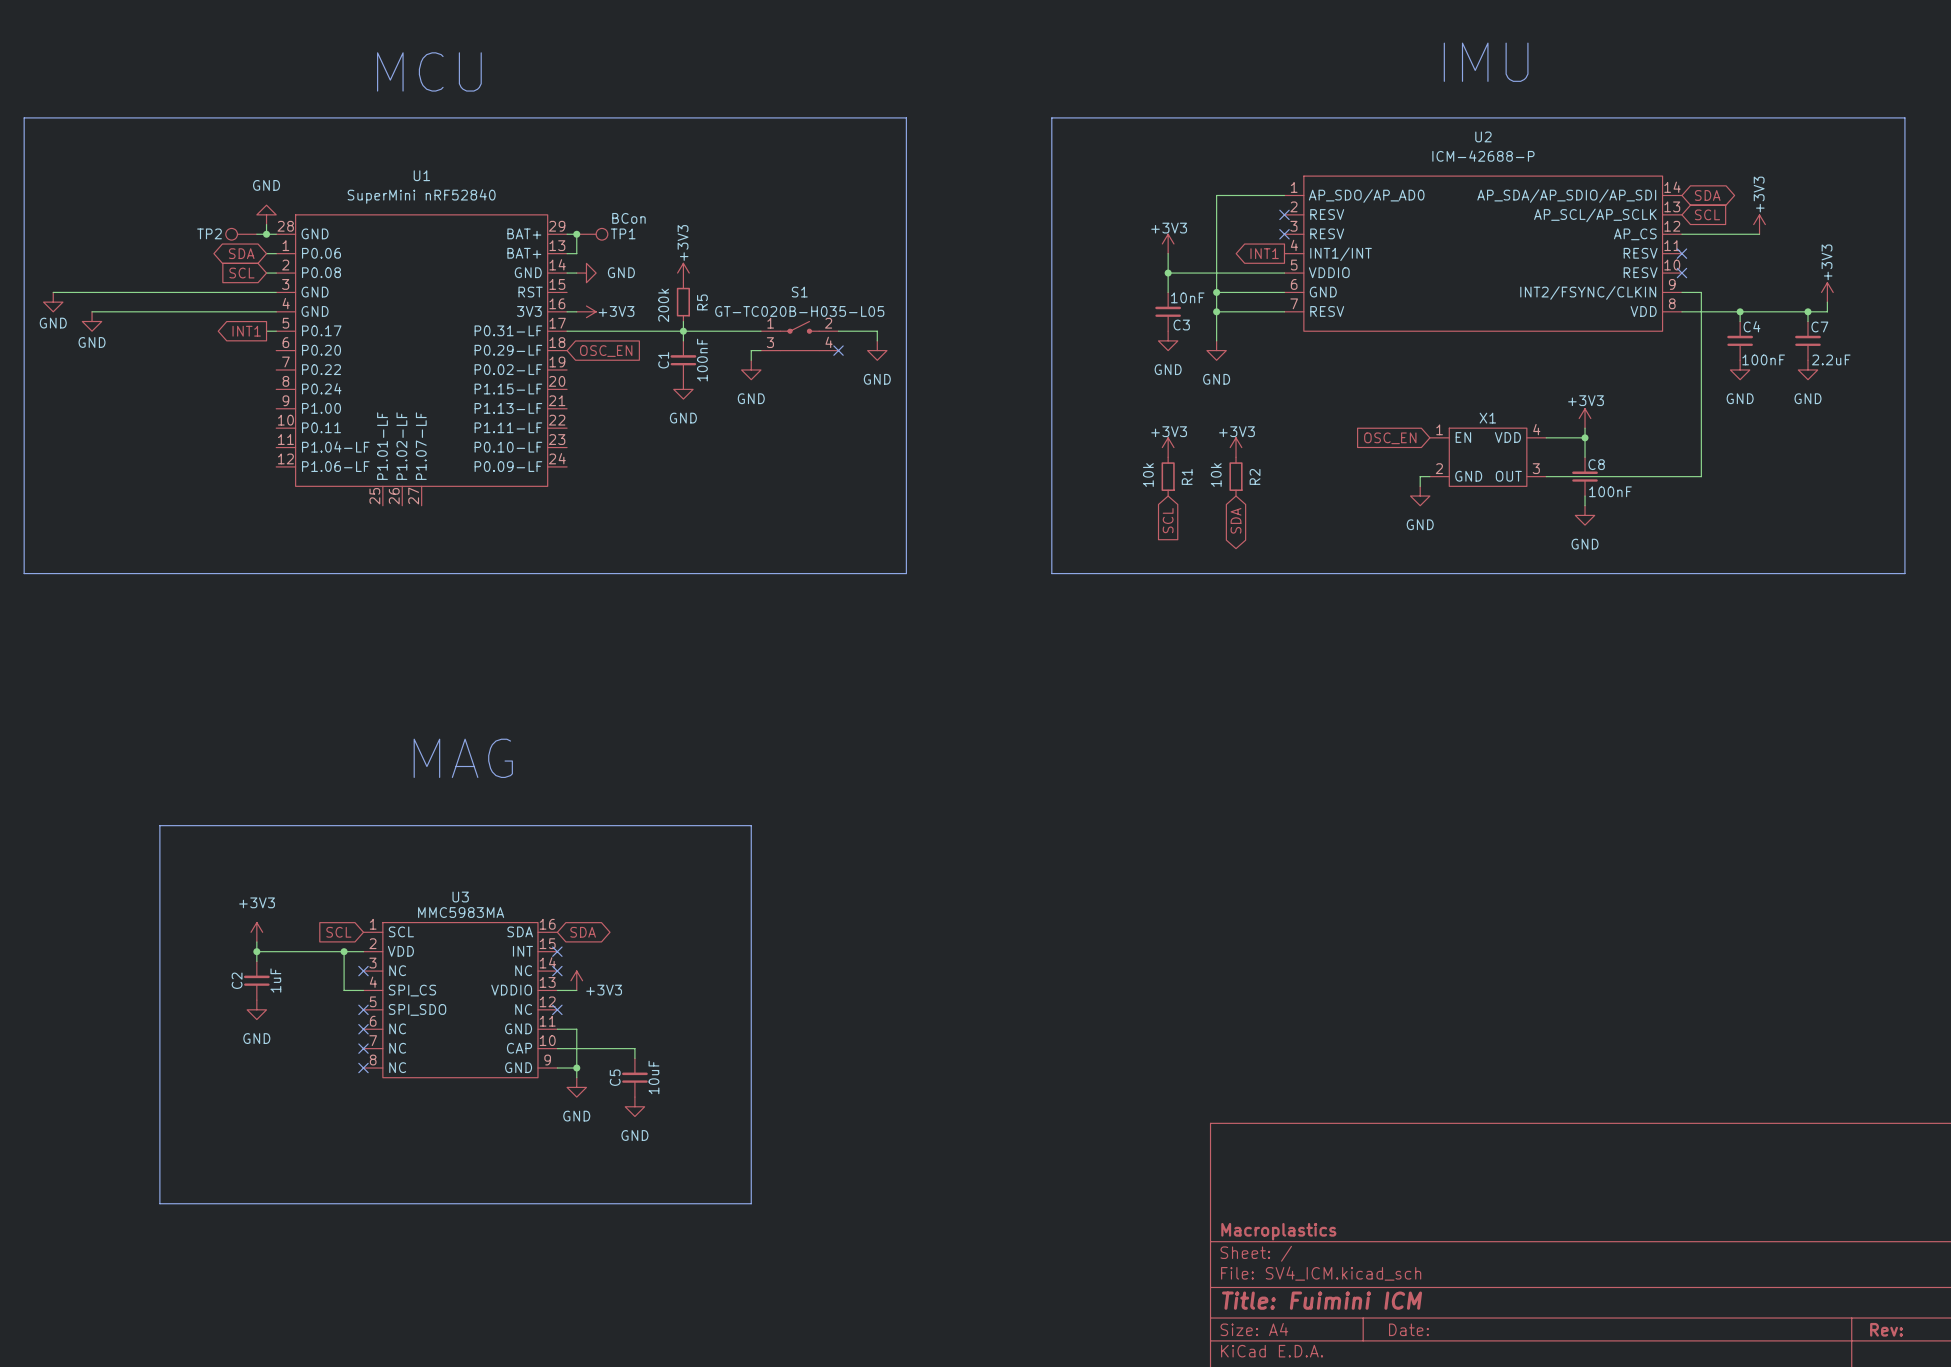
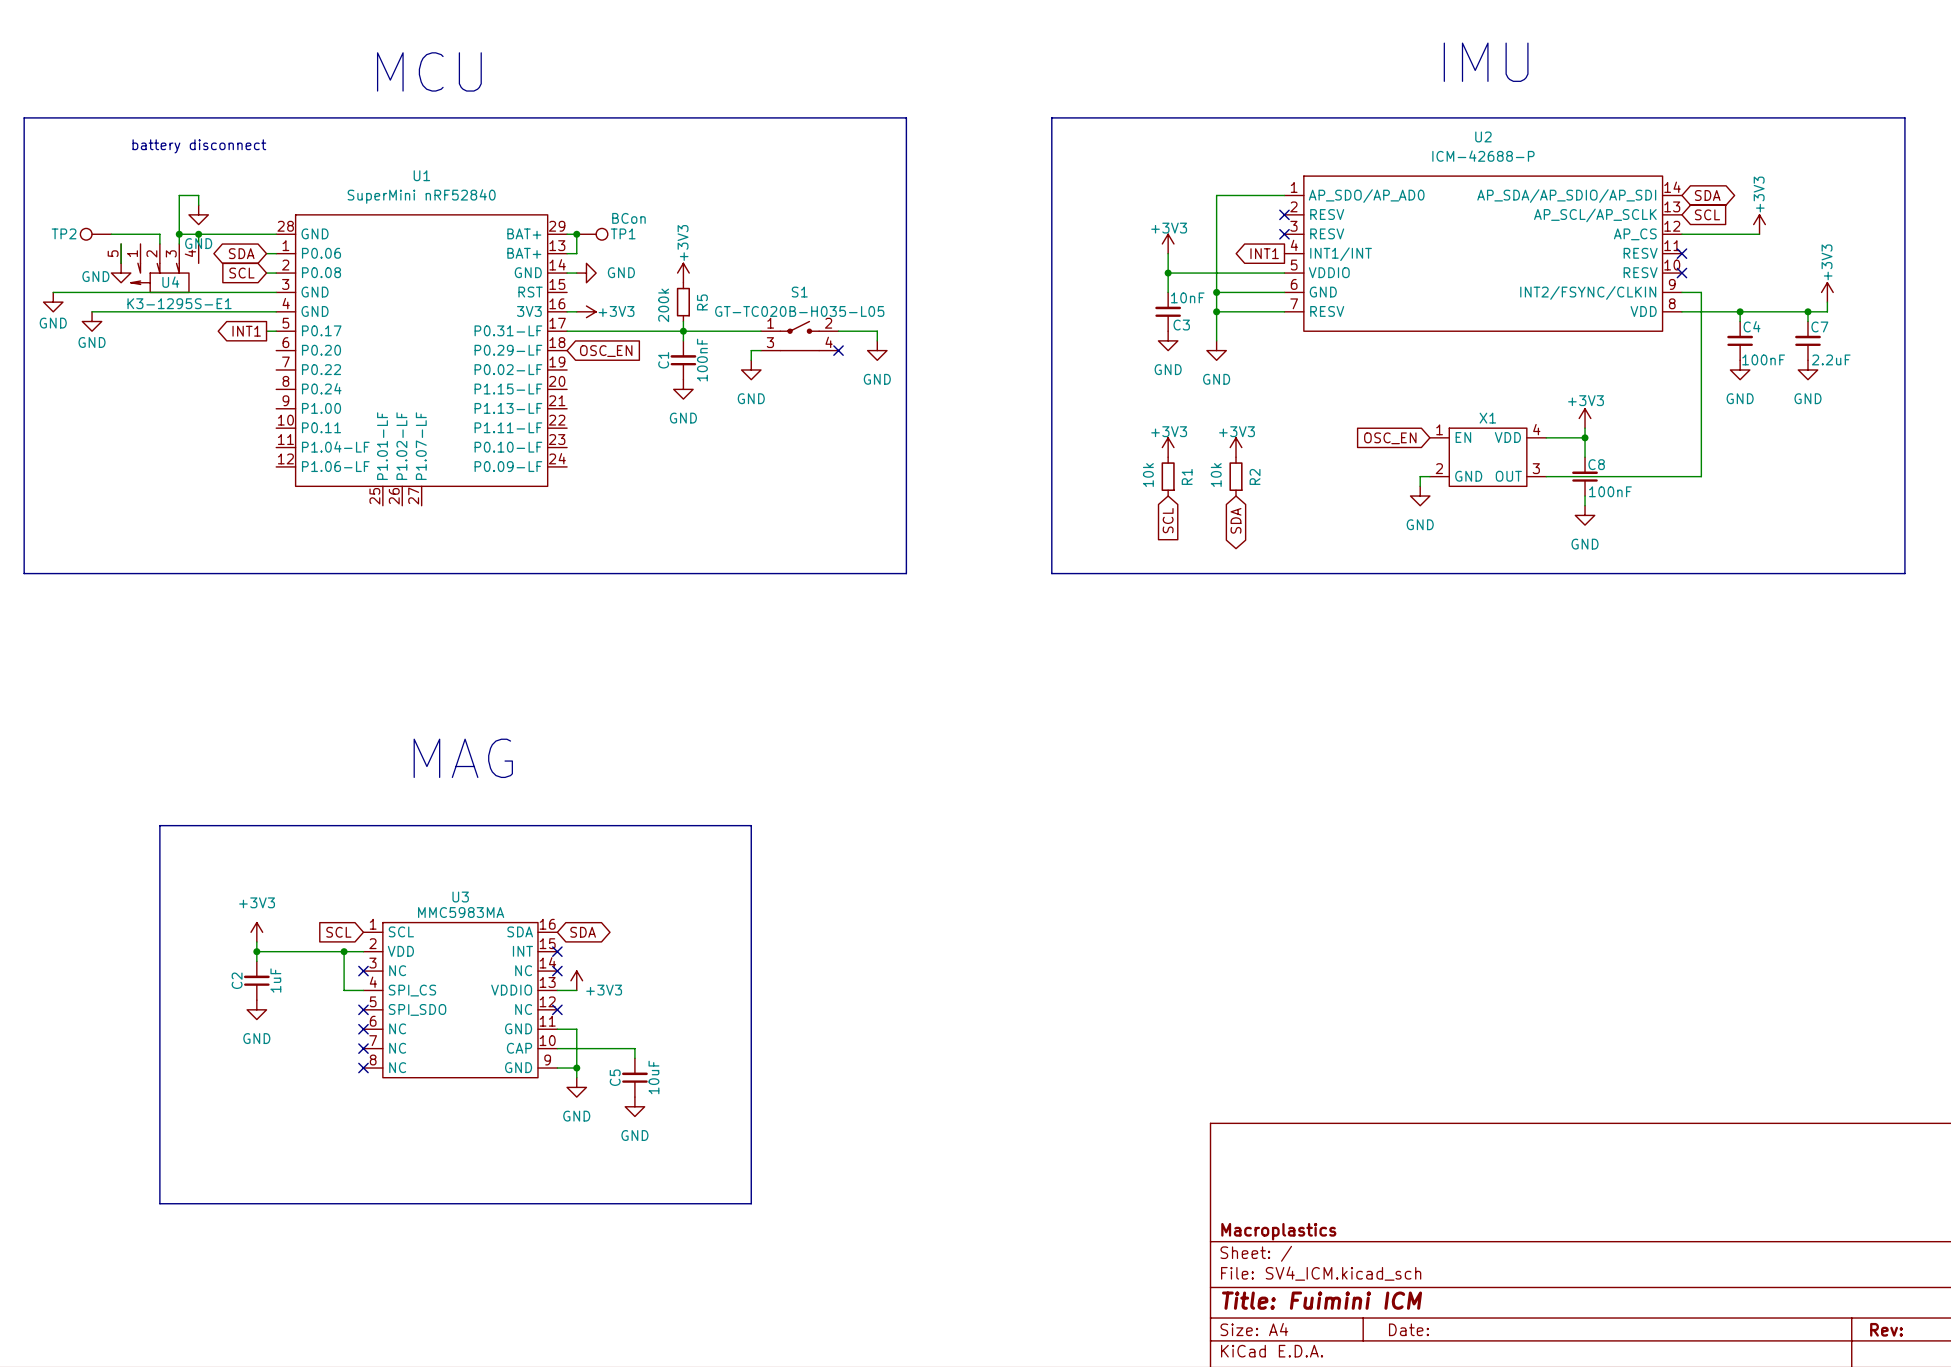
text: none -> battery disconnect (199, 146)
wire: none -> (198, 205) (198, 195) (179, 195) (179, 243)
power symbol rotation: 0° (266, 214) -> 180° (198, 214)
power symbol position: GND (266, 214) -> GND (198, 214)
wire: (266, 224) (266, 234) -> (198, 234) (198, 243)
wire: none -> (111, 234) (159, 234) (159, 243)
wire: none -> (179, 234) (256, 234)
junction: none -> (179, 234)
junction: none -> (198, 234)
TP2 position: (241, 234) -> (95, 234)
junction: (266, 234) -> none
wire: none -> (121, 243) (121, 263)
U4: none -> K3-1295S-E1 (159, 268)
power symbol: none -> GND (121, 273)

